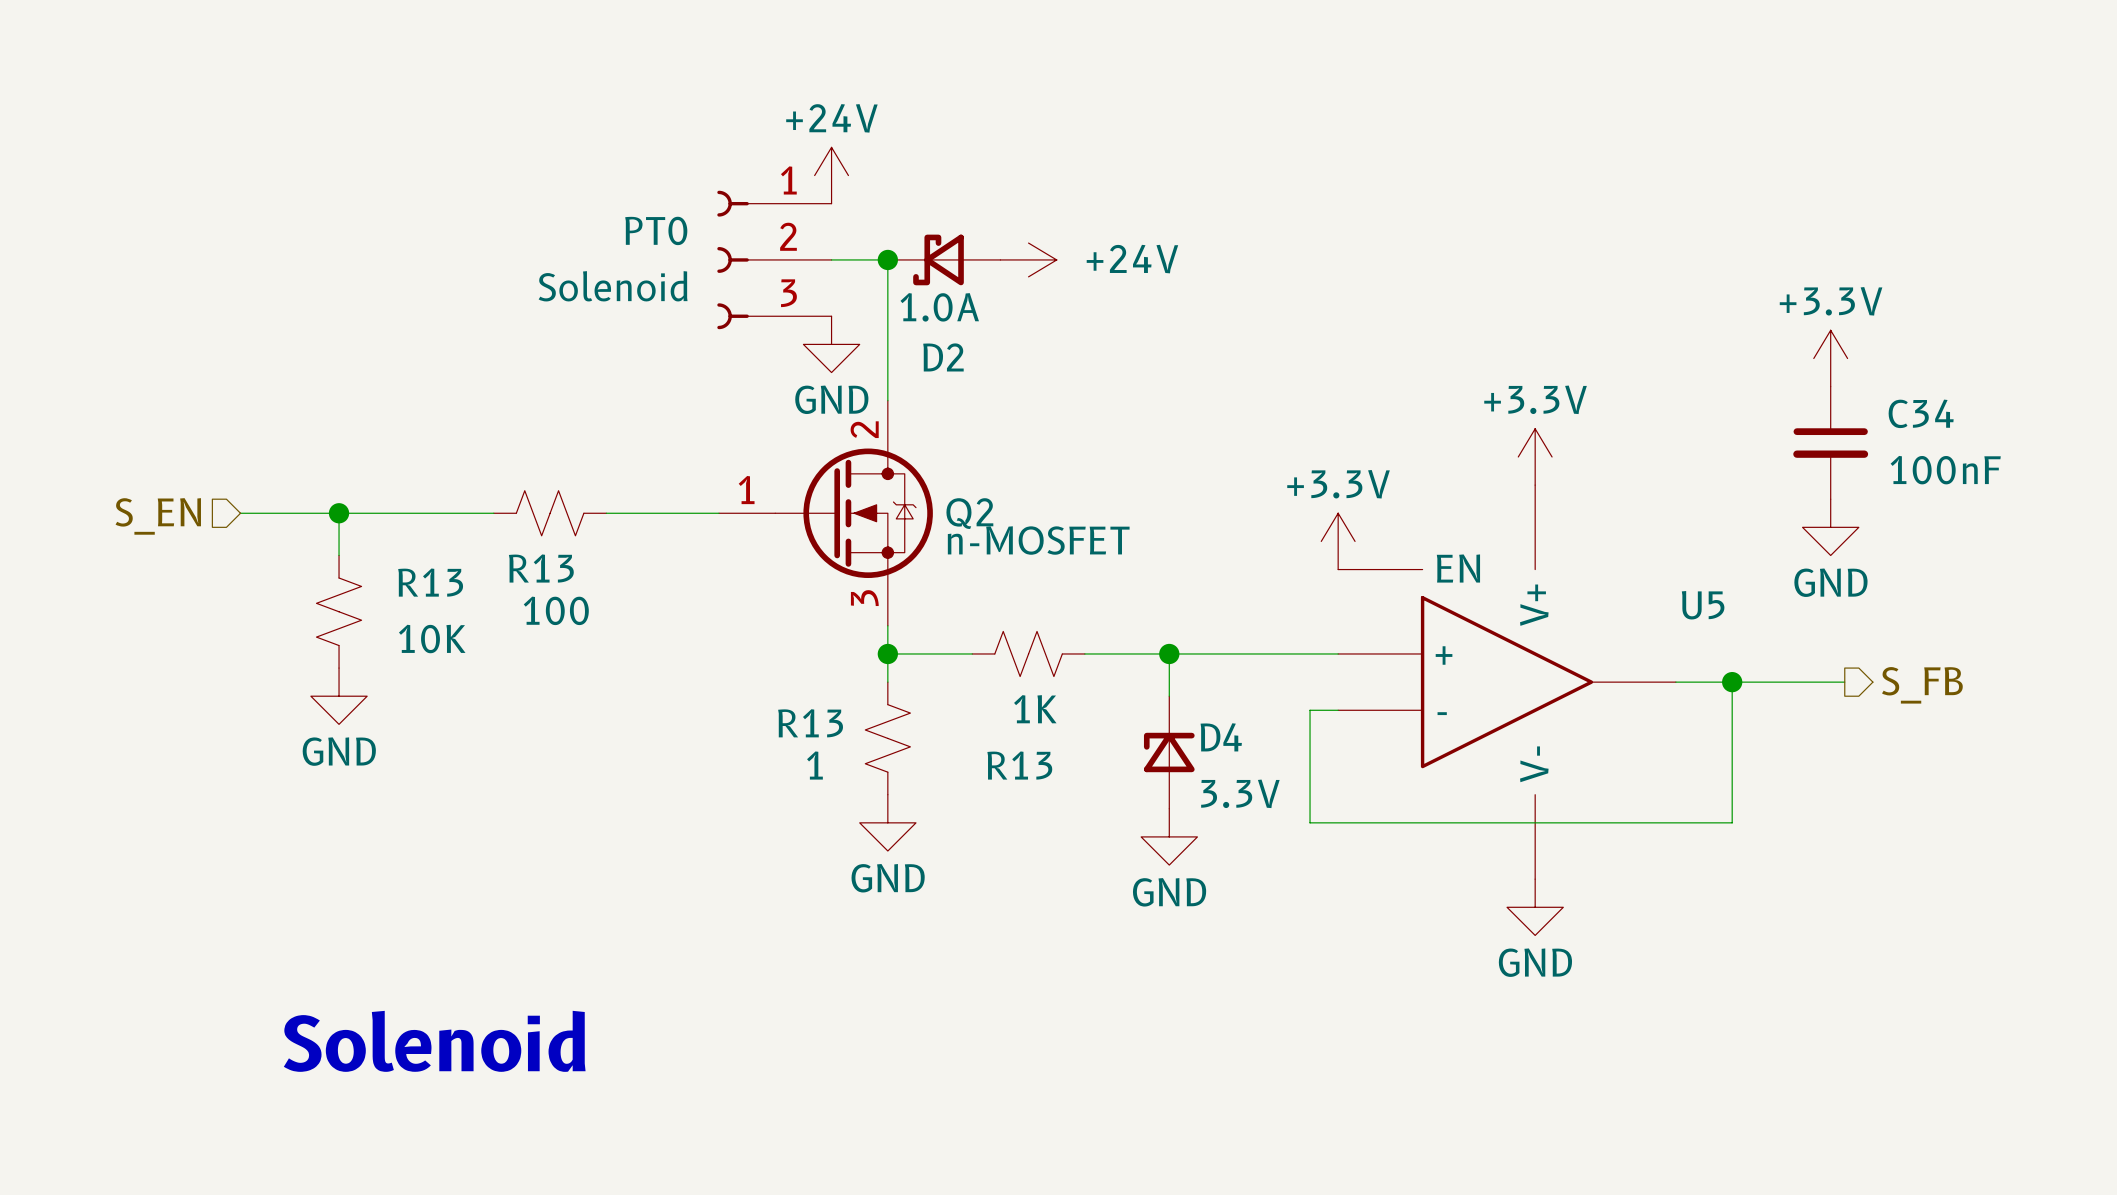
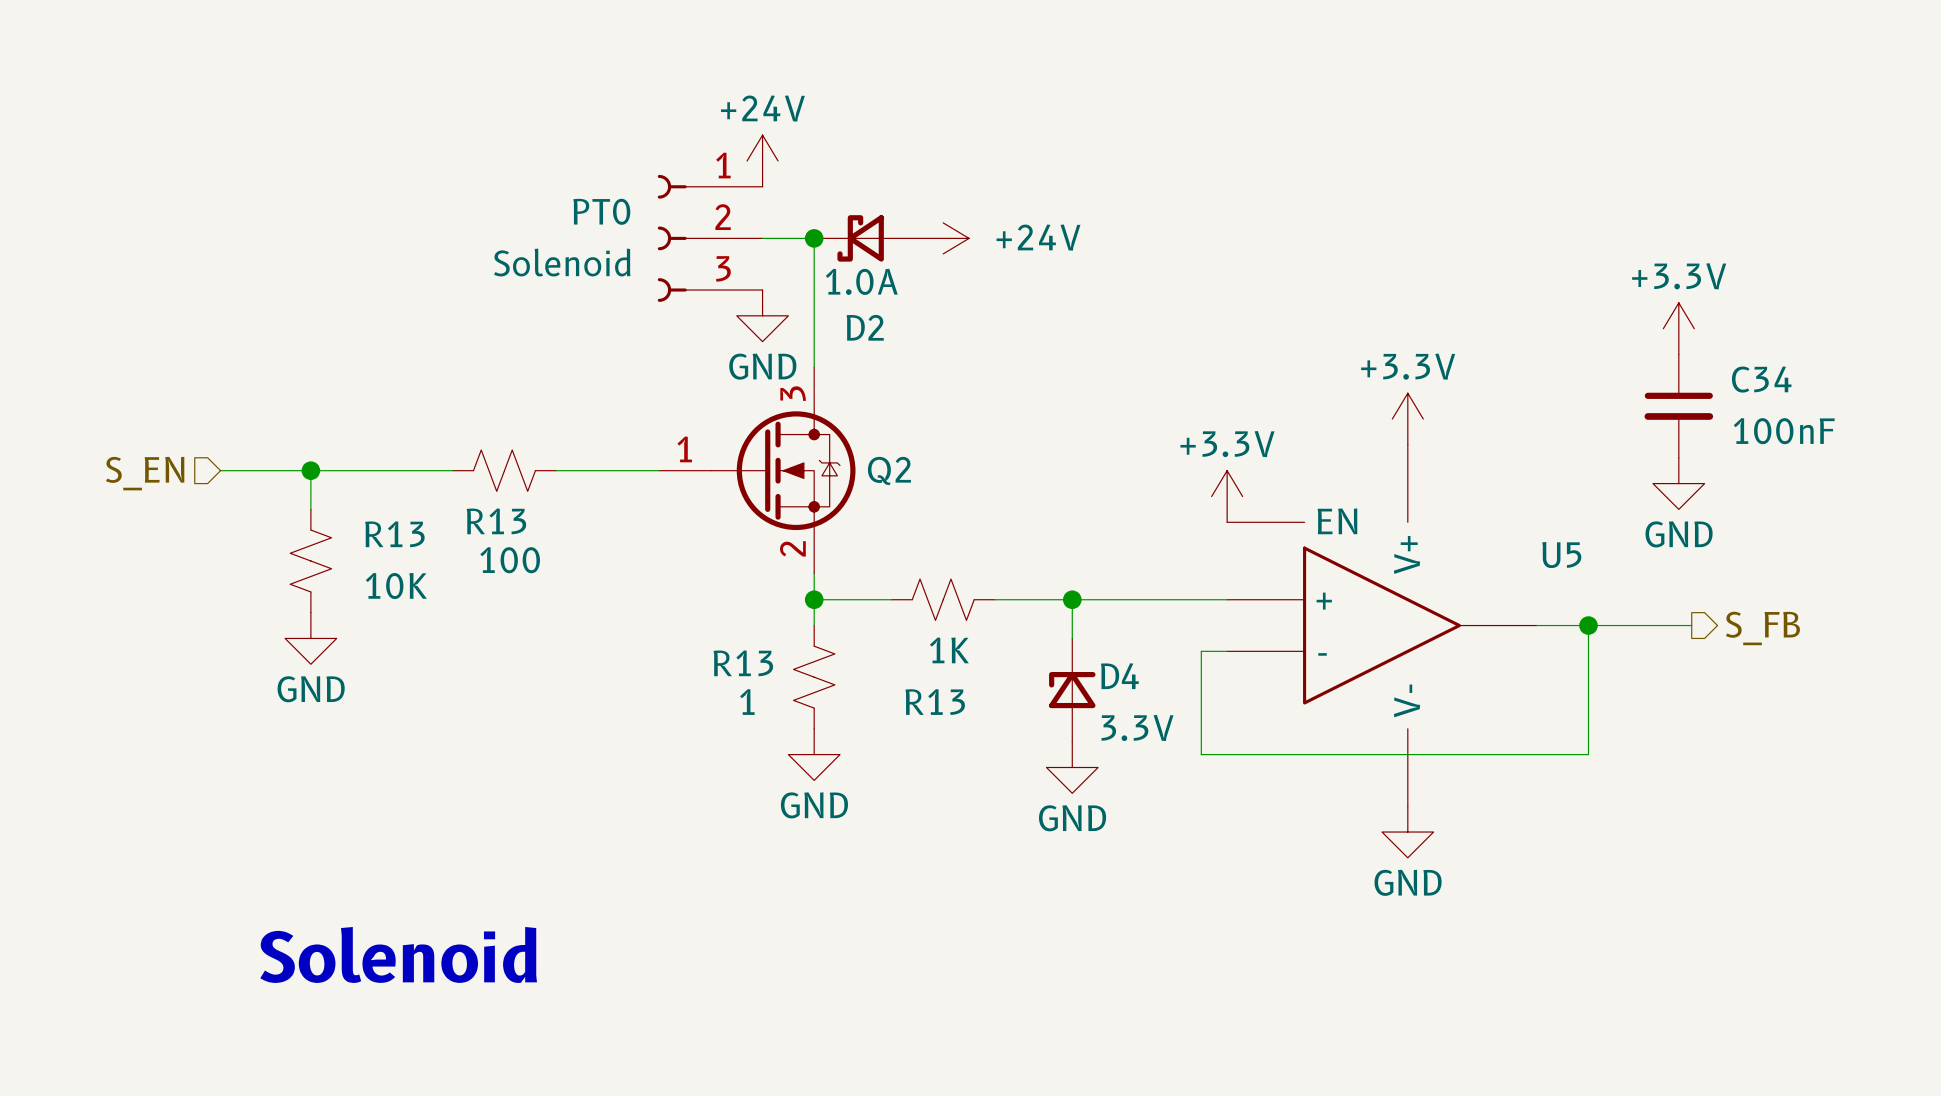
Q2 pin number: 2 (864, 429) -> 3 (793, 393)
Q2 value: n-MOSFET (1038, 540) -> none
Q2 pin number: 3 (864, 598) -> 2 (792, 548)

